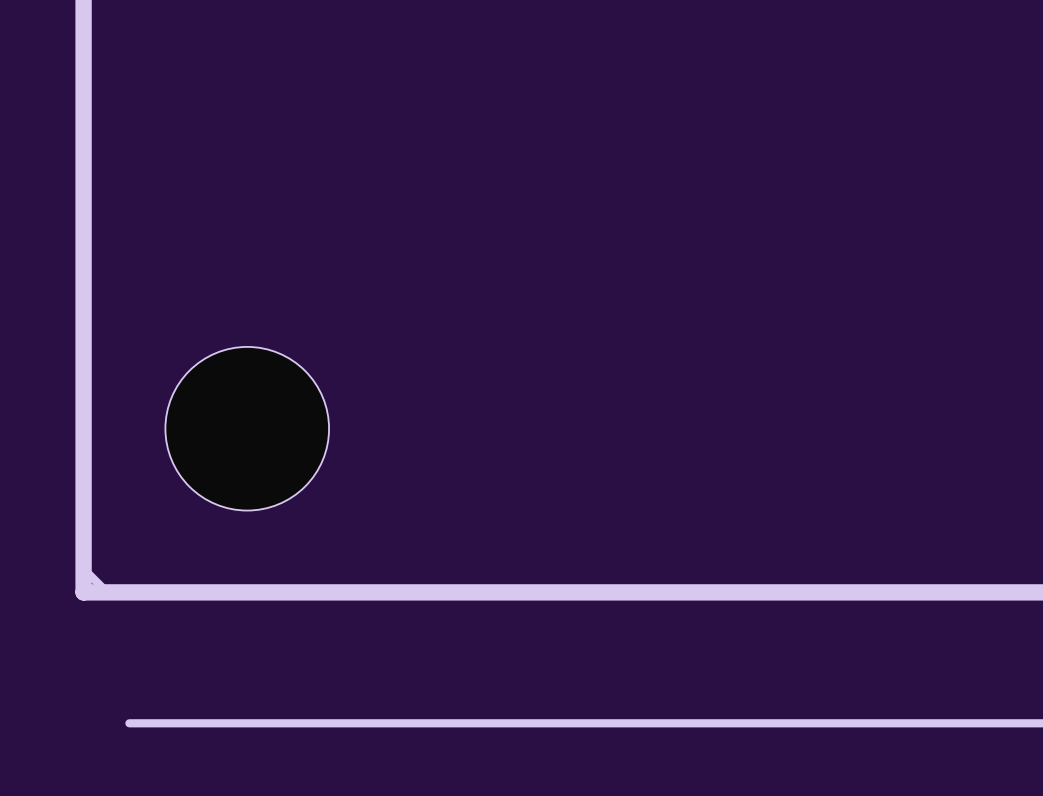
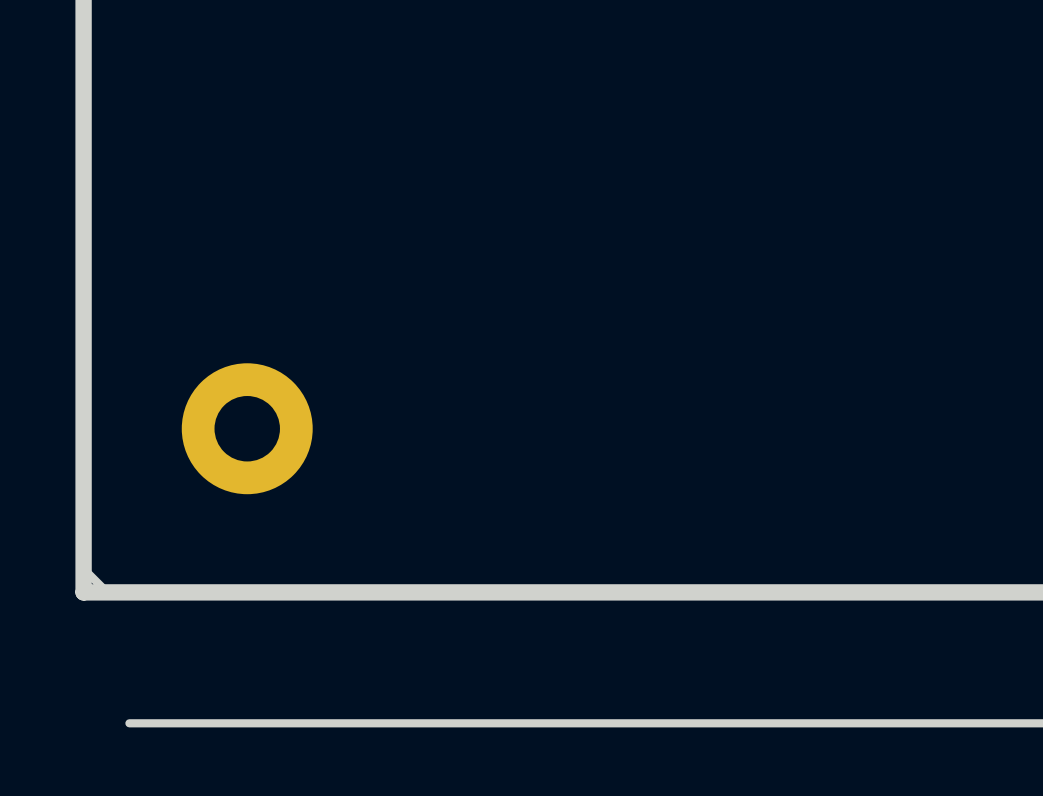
part footprint: [165, 346, 330, 511] -> [181, 363, 313, 495]

